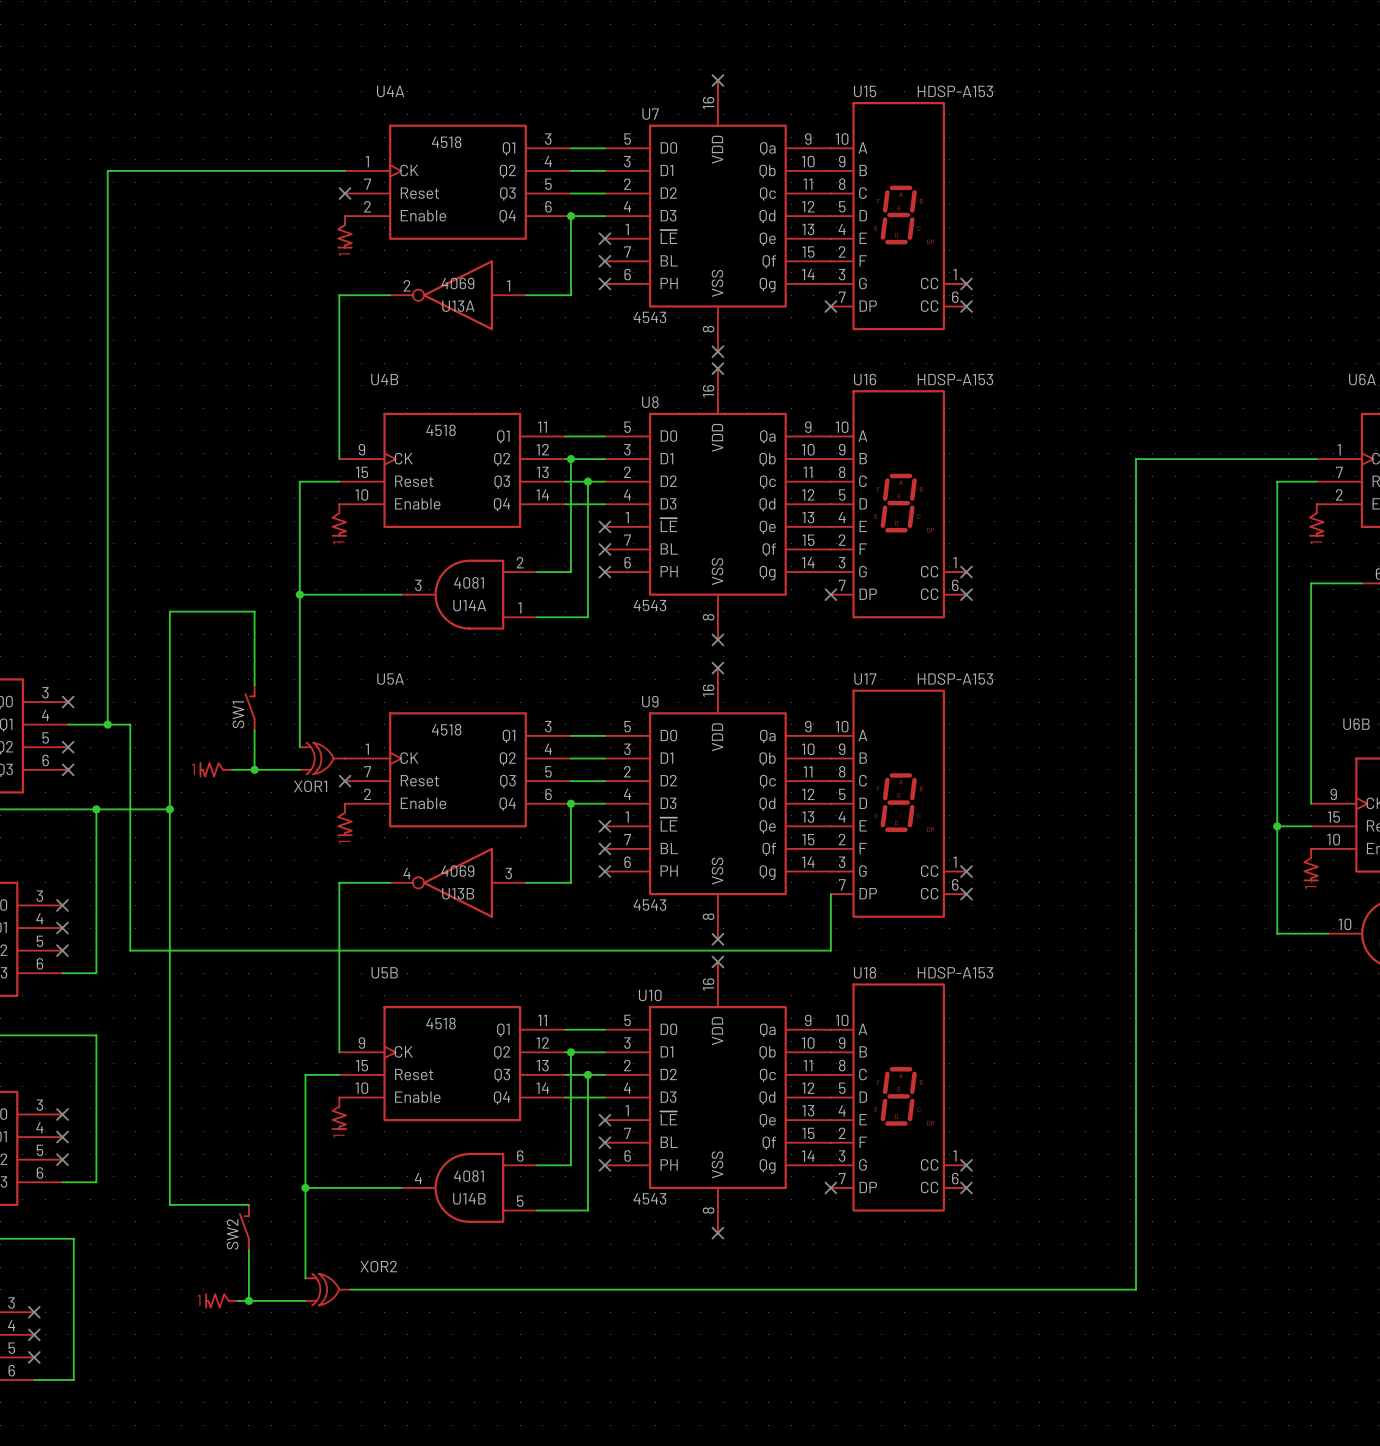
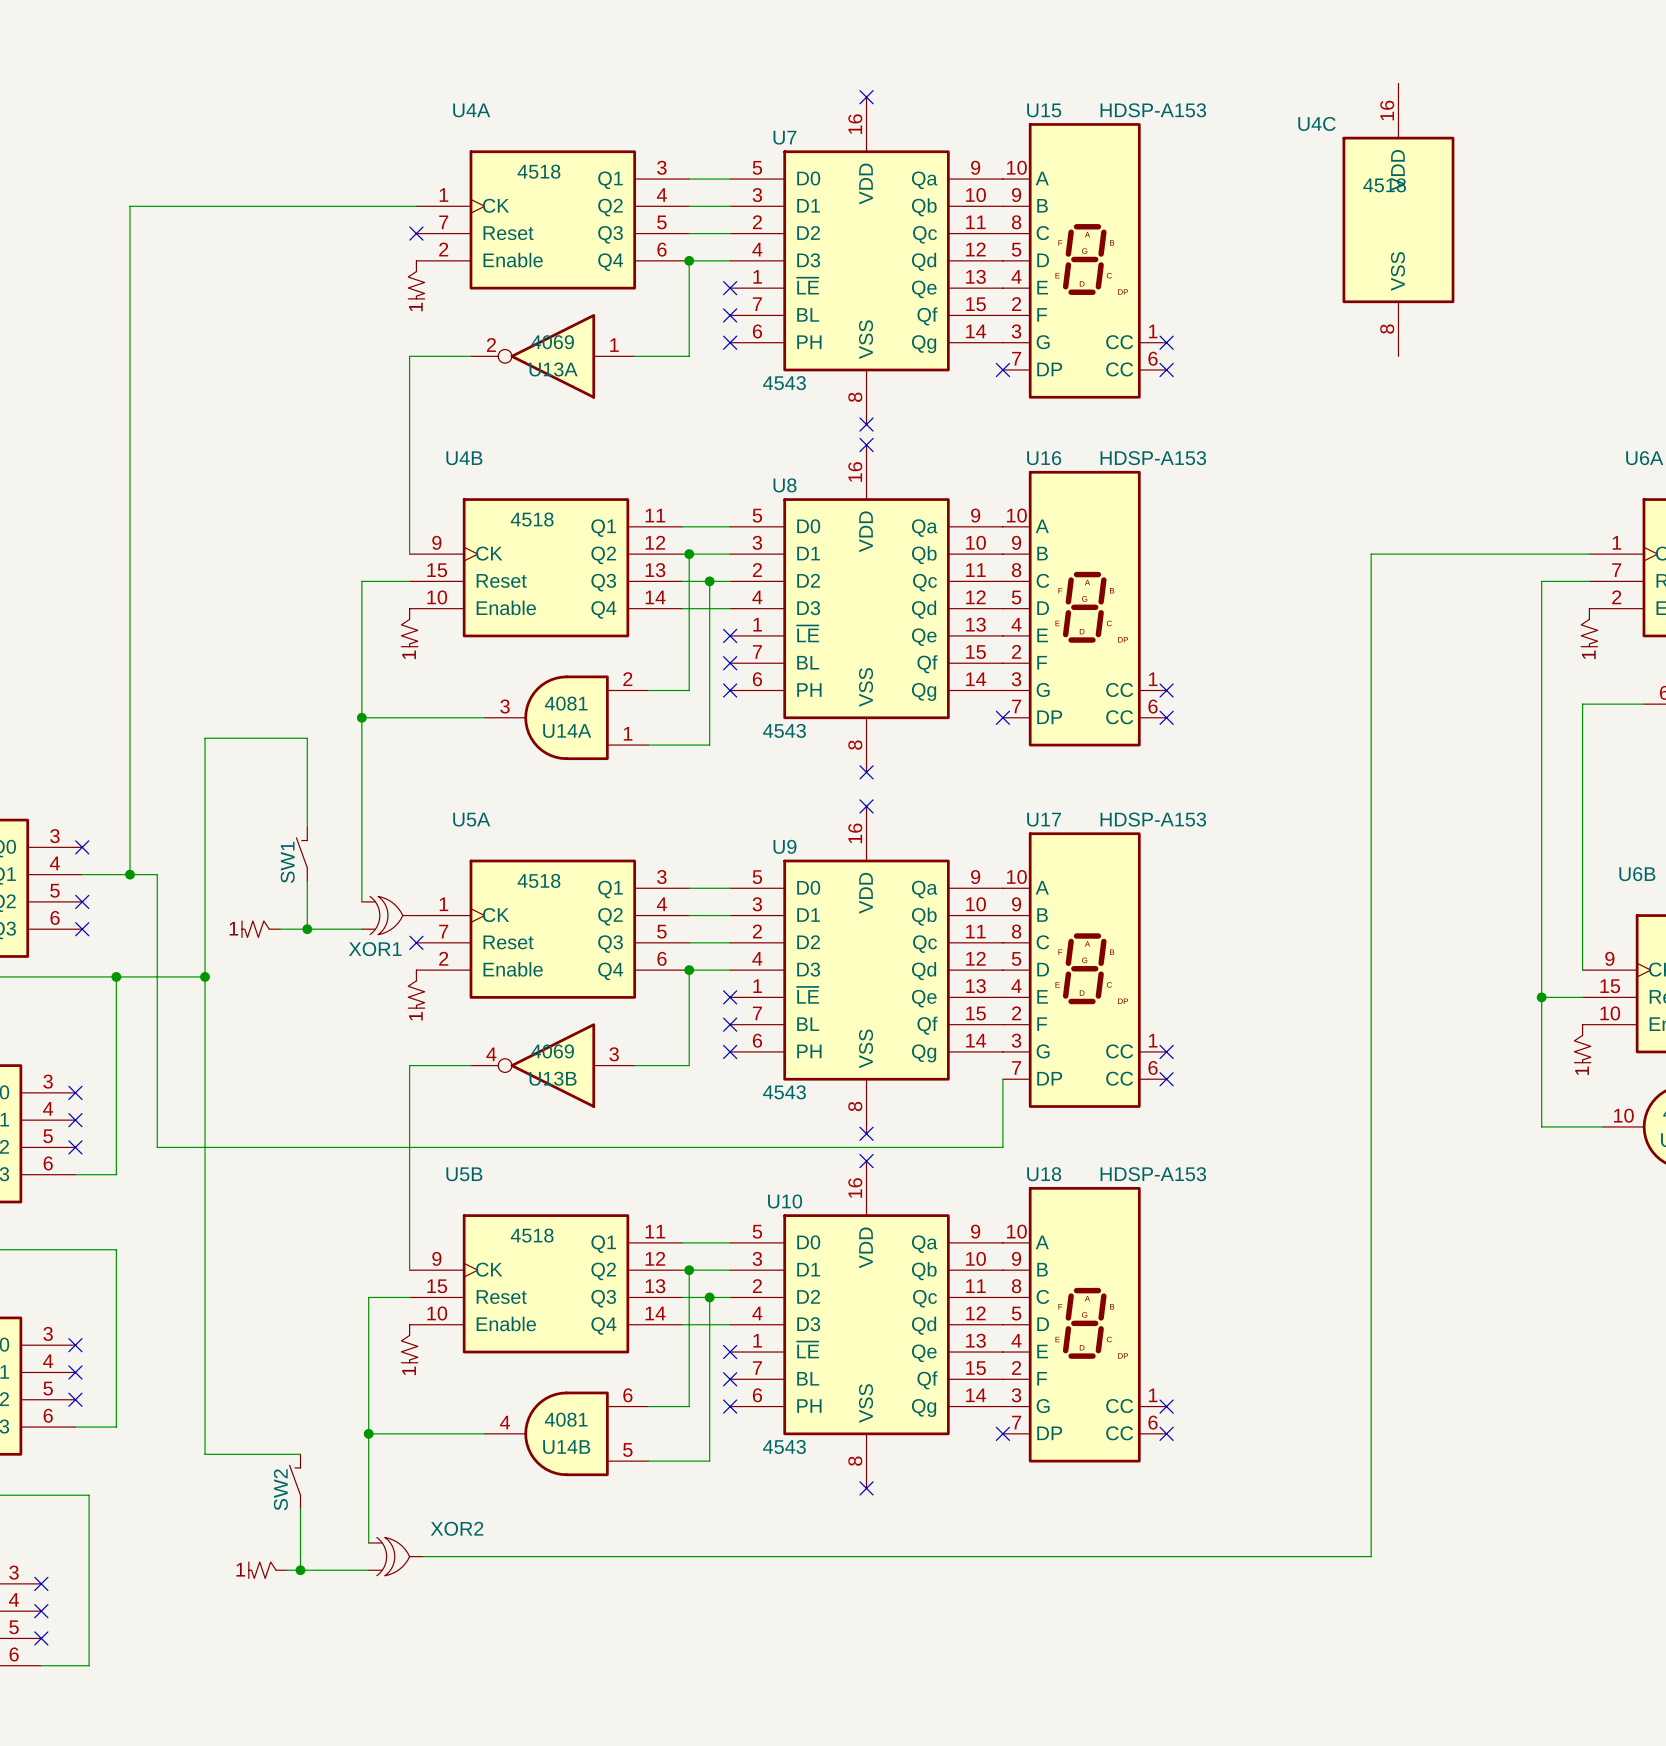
U4C: none -> 4518 (1398, 219)

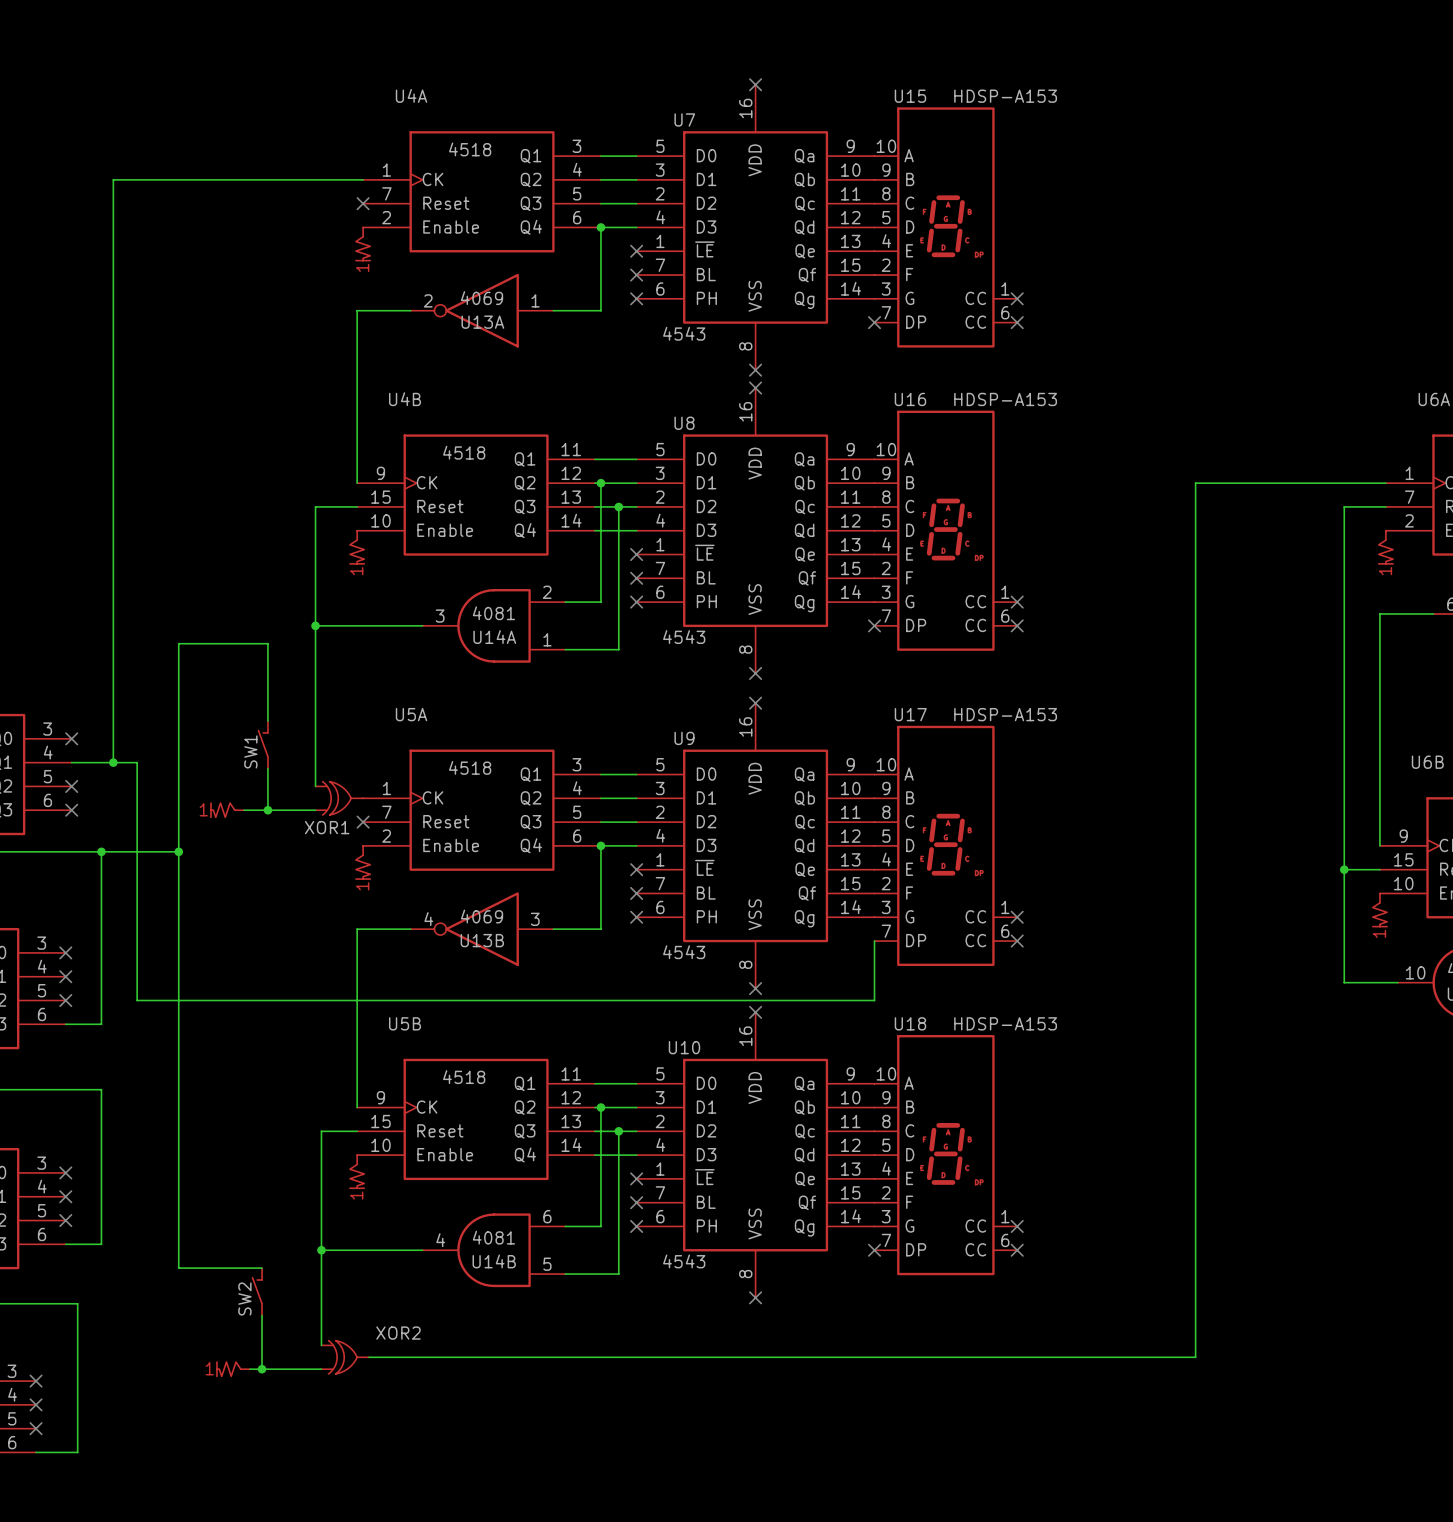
U4C: 4518 (1398, 219) -> none

